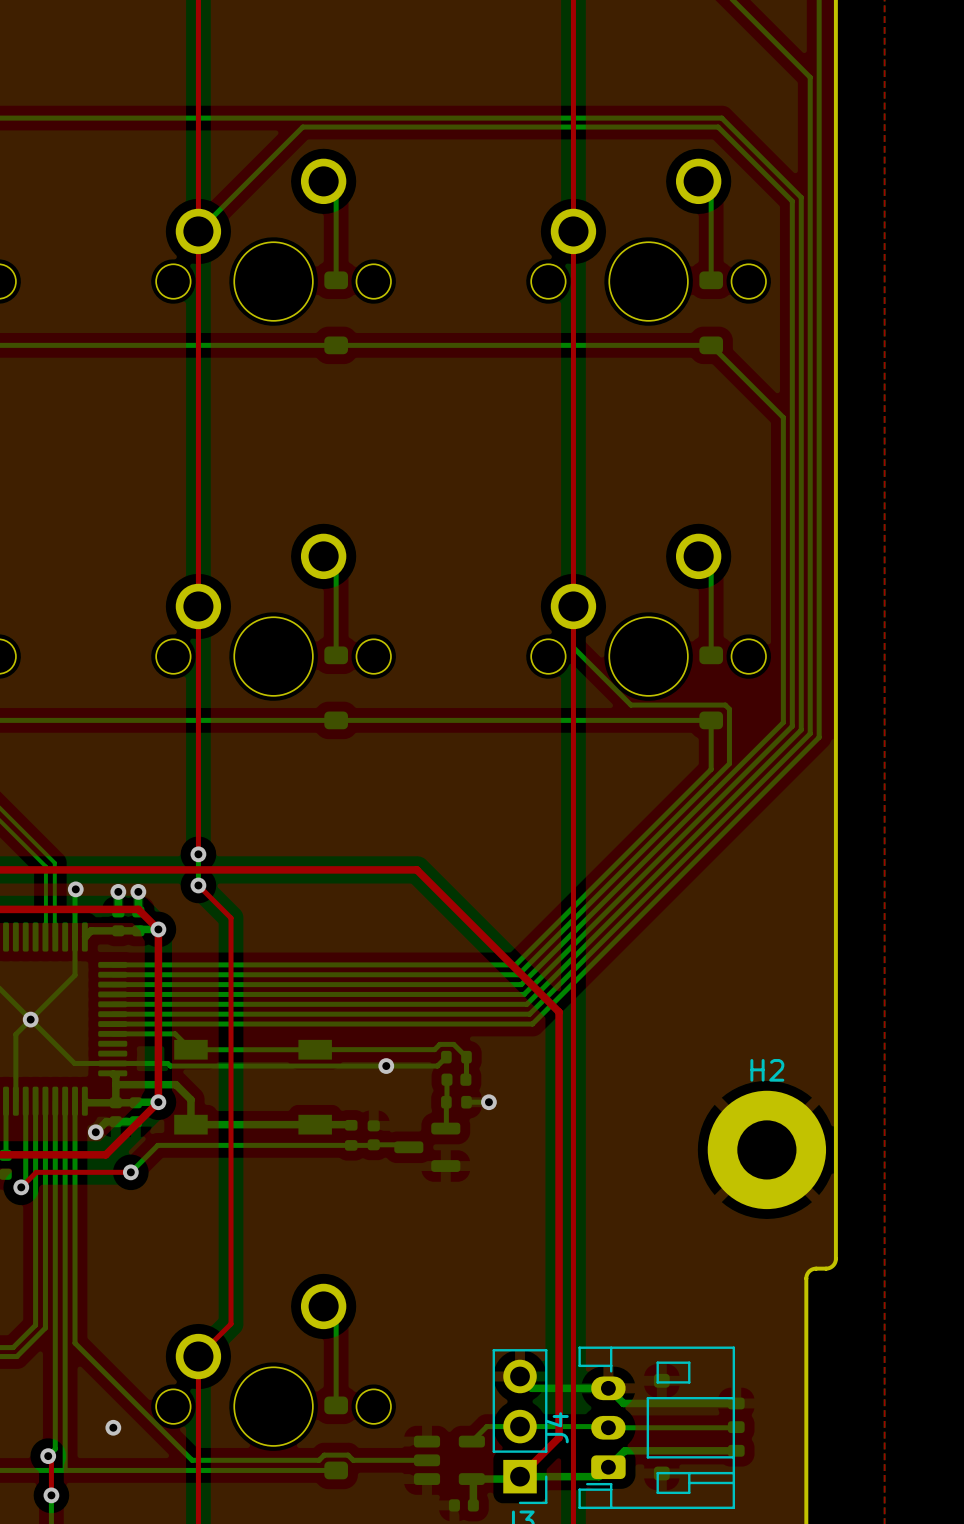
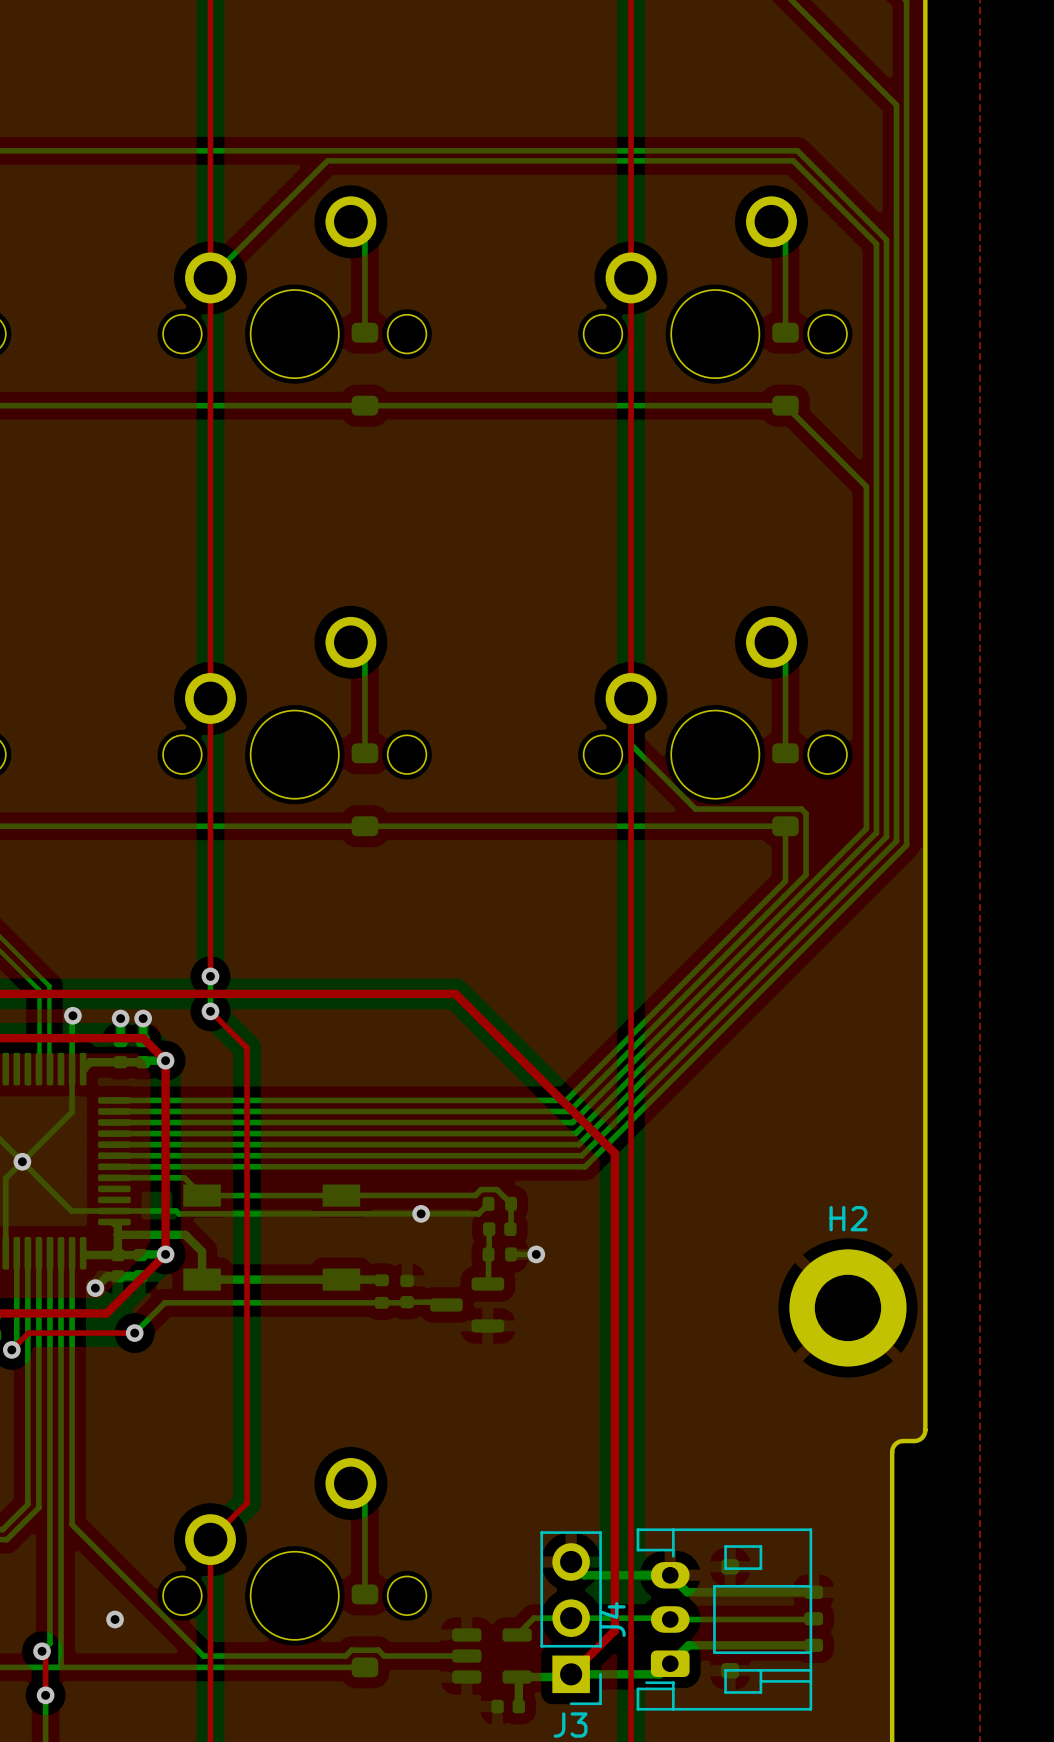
H2 footprint: [707, 1090, 827, 1210] -> [789, 1249, 907, 1367]

